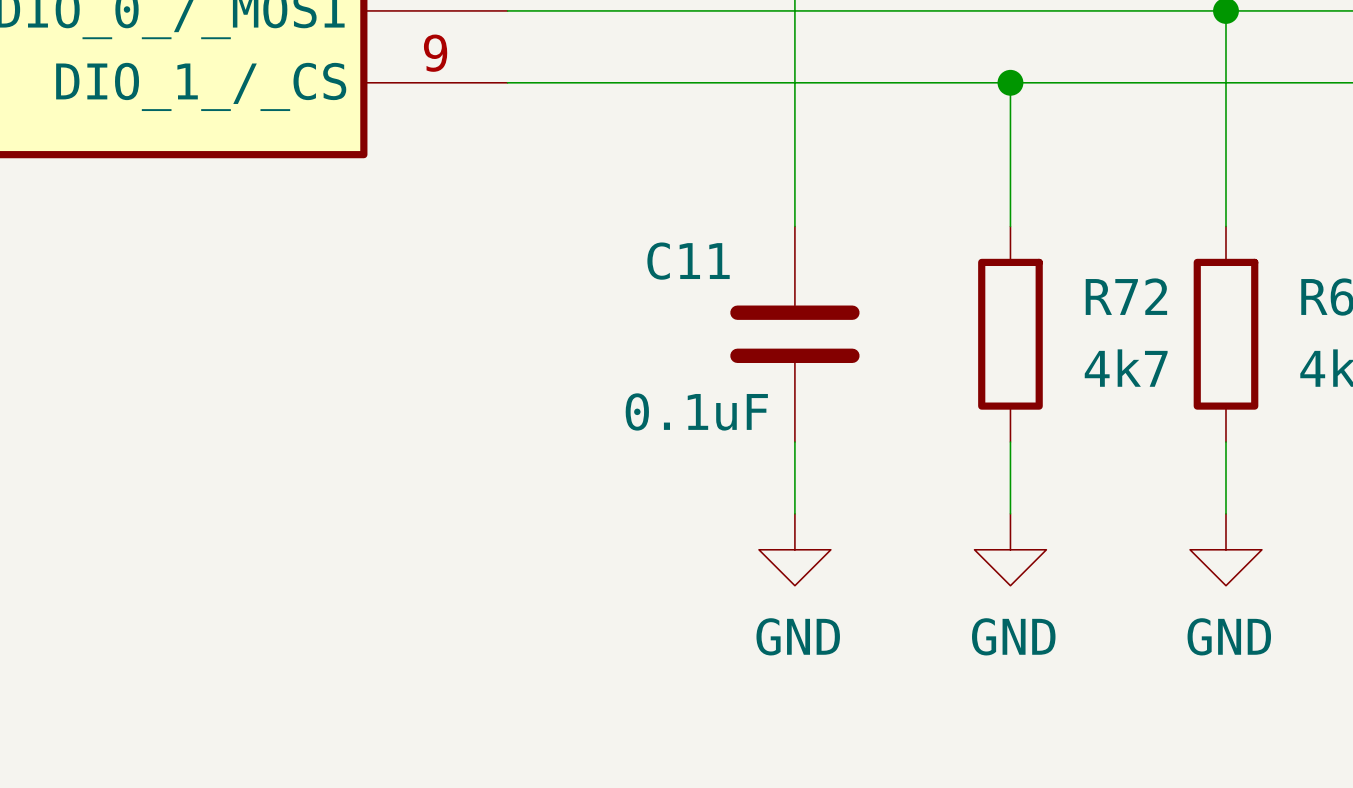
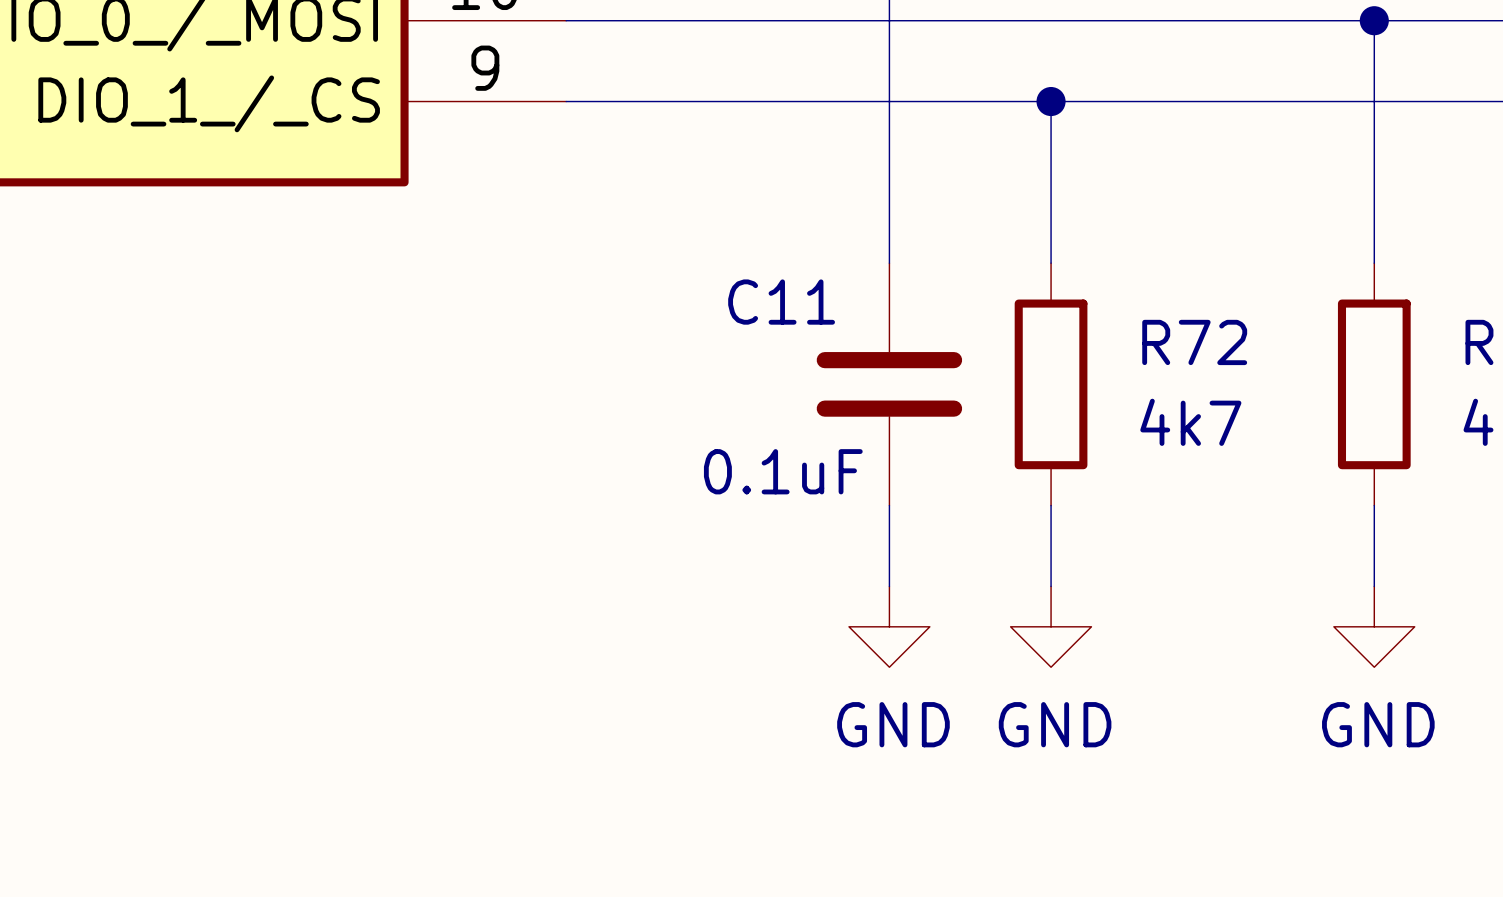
wire: (1010, 82) (1010, 226) -> (1051, 101) (1051, 263)
junction position: (1010, 82) -> (1051, 101)
R72 position: (1010, 334) -> (1051, 384)
wire: (1010, 442) (1010, 513) -> (1051, 505) (1051, 586)
power symbol position: GND (1010, 549) -> GND (1051, 626)

